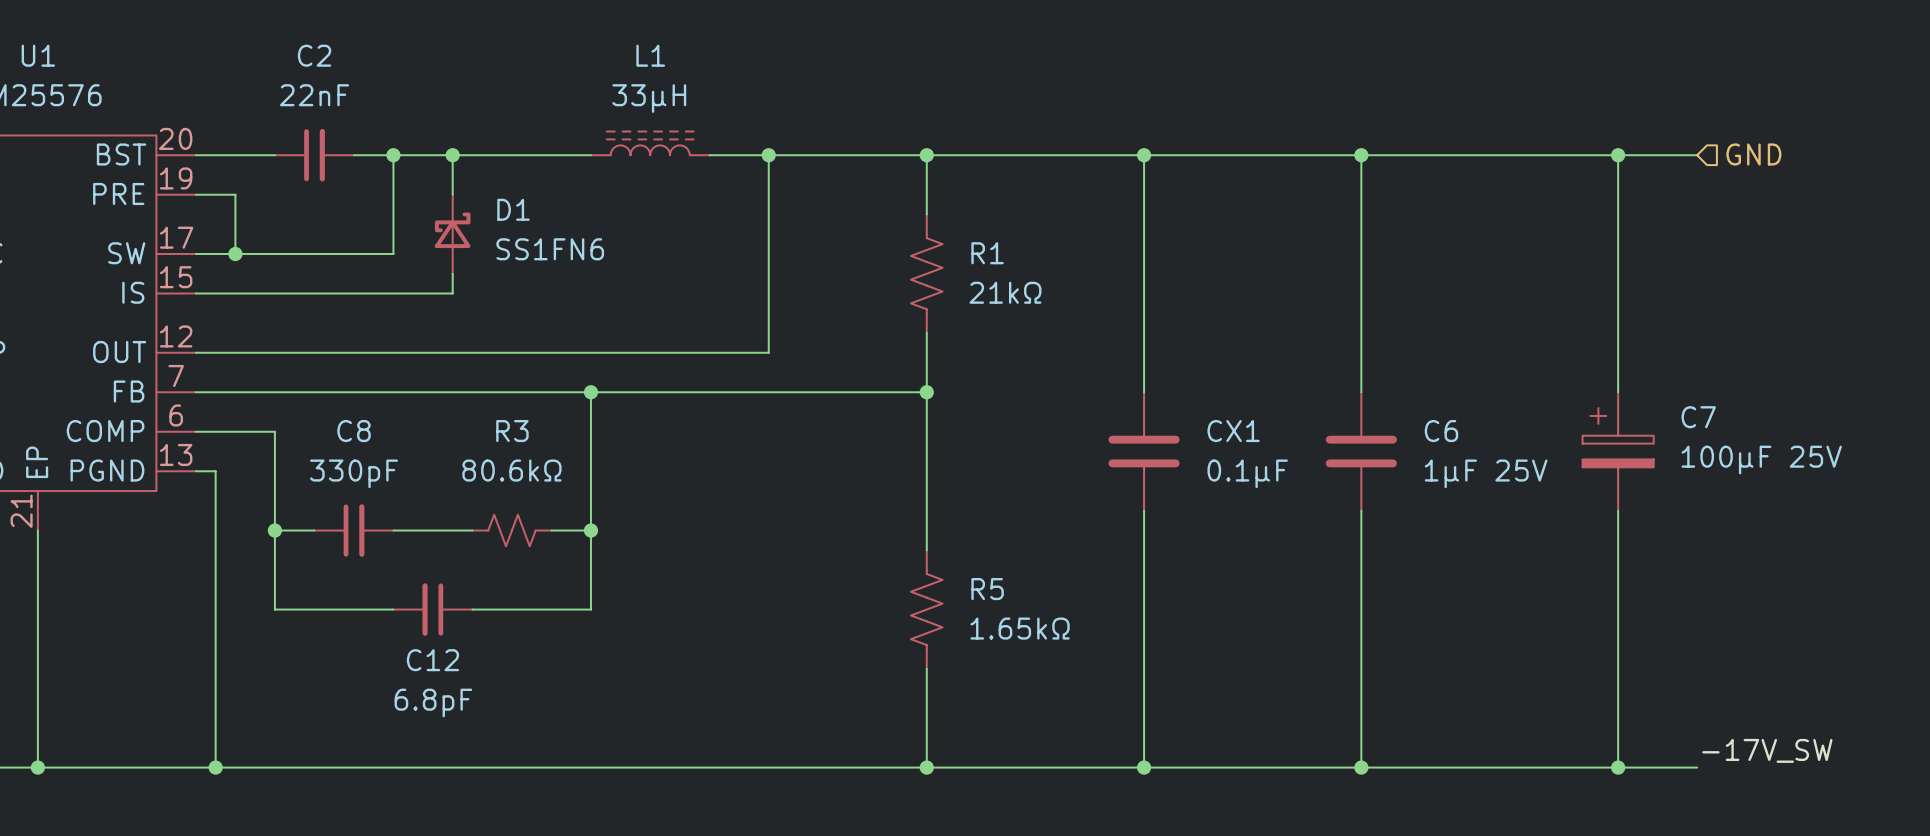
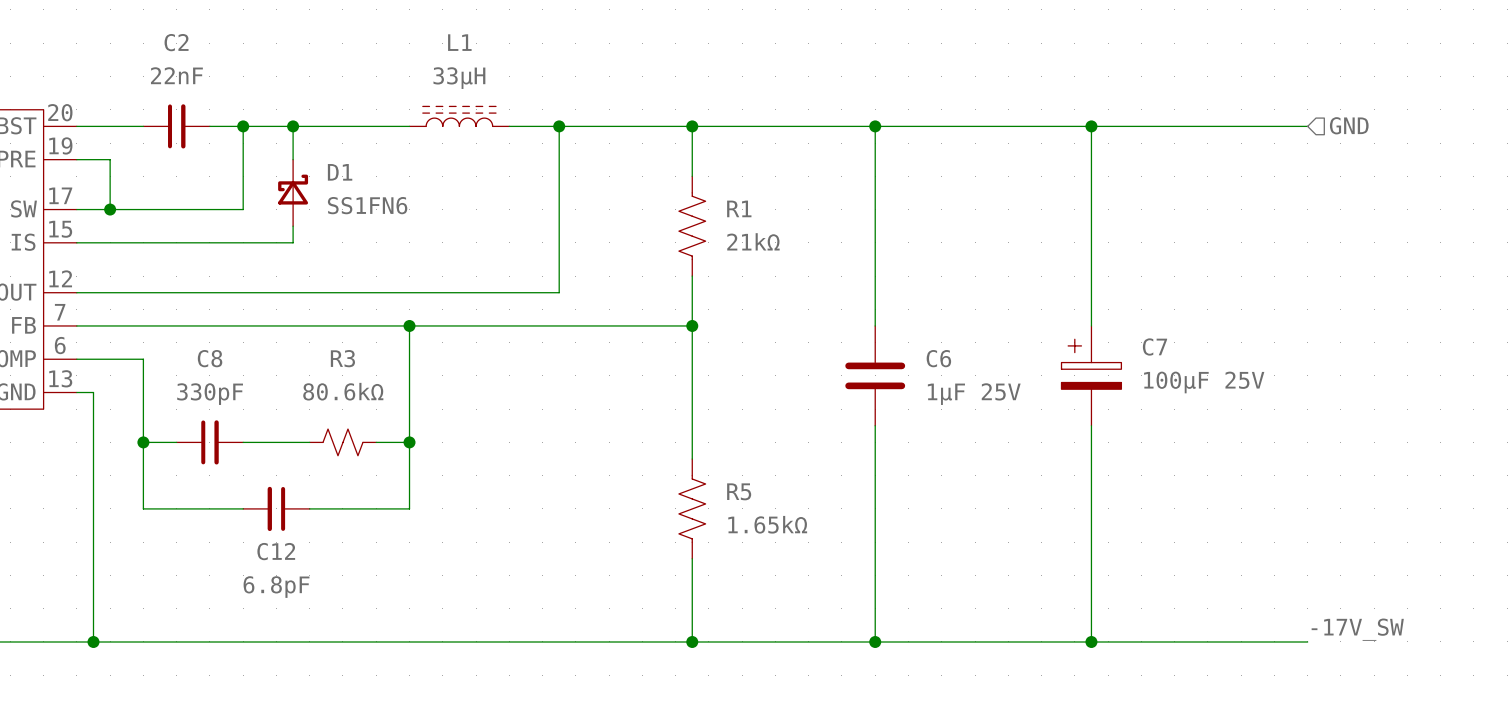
hierarchical label position: GND (1753, 154) -> GND (1349, 125)
wire: (1361, 155) (1361, 392) -> (1091, 126) (1091, 325)
junction position: (1361, 155) -> (1091, 126)
wire: (1618, 155) (1618, 392) -> none
junction: (1618, 155) -> none
wire: (1657, 155) (1697, 155) -> none
CX1 name: CX1 (1233, 431) -> C6 (938, 358)
C6: 1µF 25V (1361, 451) -> none
C7 position: (1618, 451) -> (1091, 375)
CX1 value: 0.1µF (1247, 473) -> 1µF 25V (974, 394)
wire: (1361, 510) (1361, 767) -> (1091, 425) (1091, 641)
wire: (1618, 510) (1618, 767) -> none
label position: -17V_SW (1767, 750) -> -17V_SW (1357, 629)
junction position: (1361, 767) -> (1091, 641)
junction: (1618, 767) -> none
wire: (1657, 767) (1697, 767) -> none

